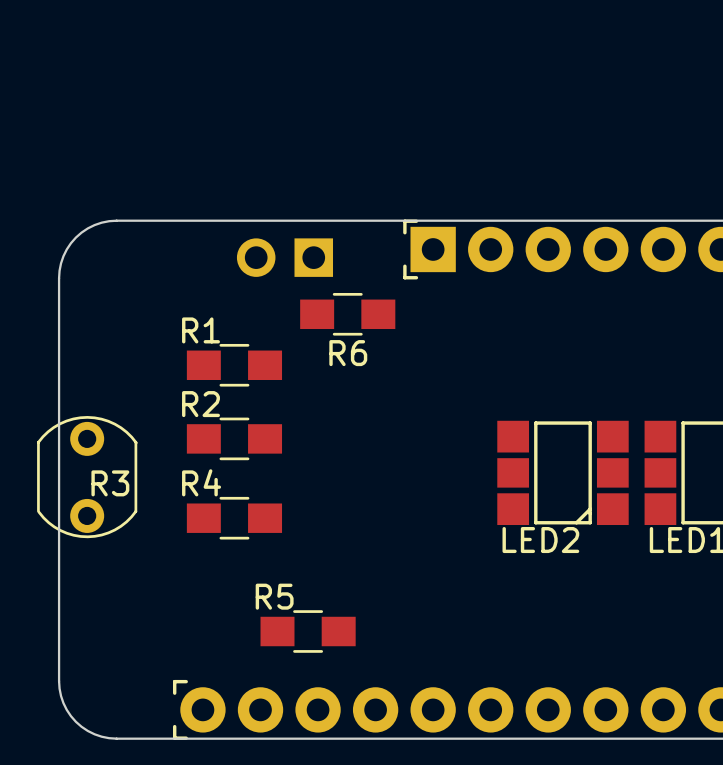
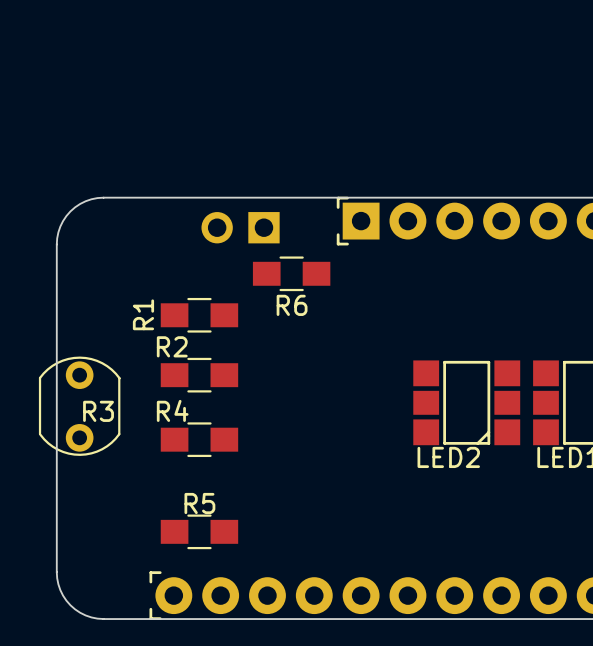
R1 name rotation: 0° (201, 330) -> 90° counterclockwise (143, 314)
R5 name position: R5 (274, 596) -> R5 (199, 503)
R5 position: (308, 631) -> (199, 531)

